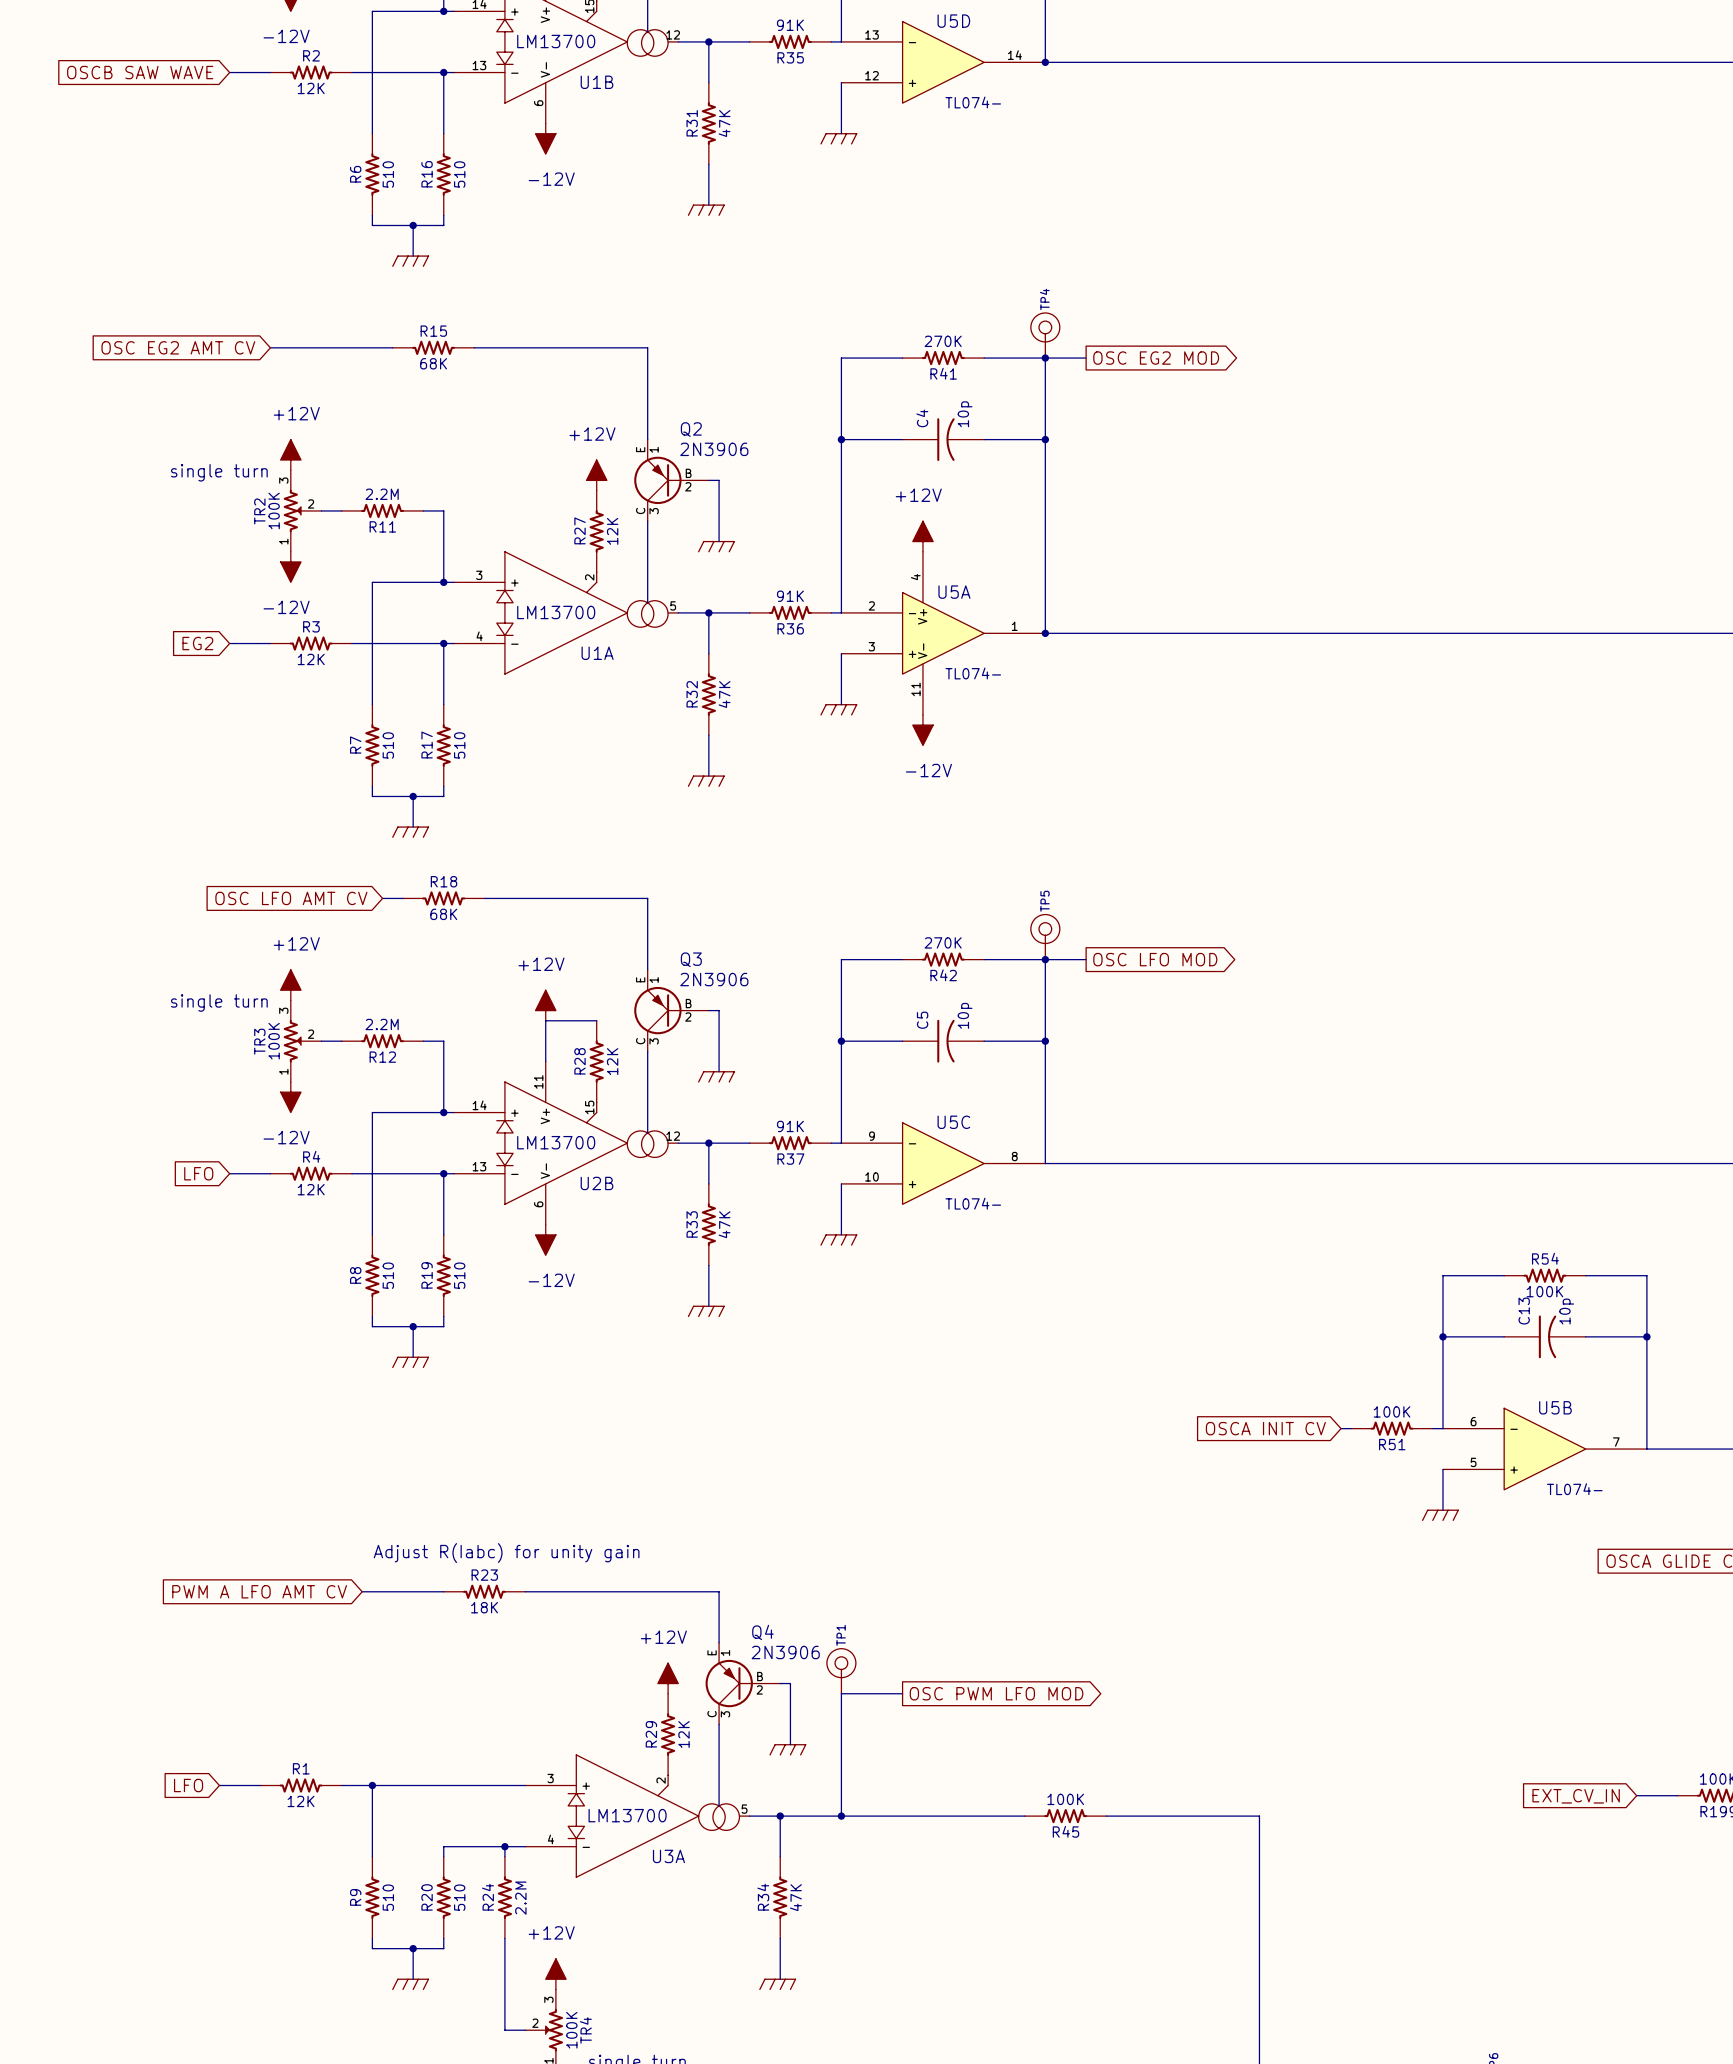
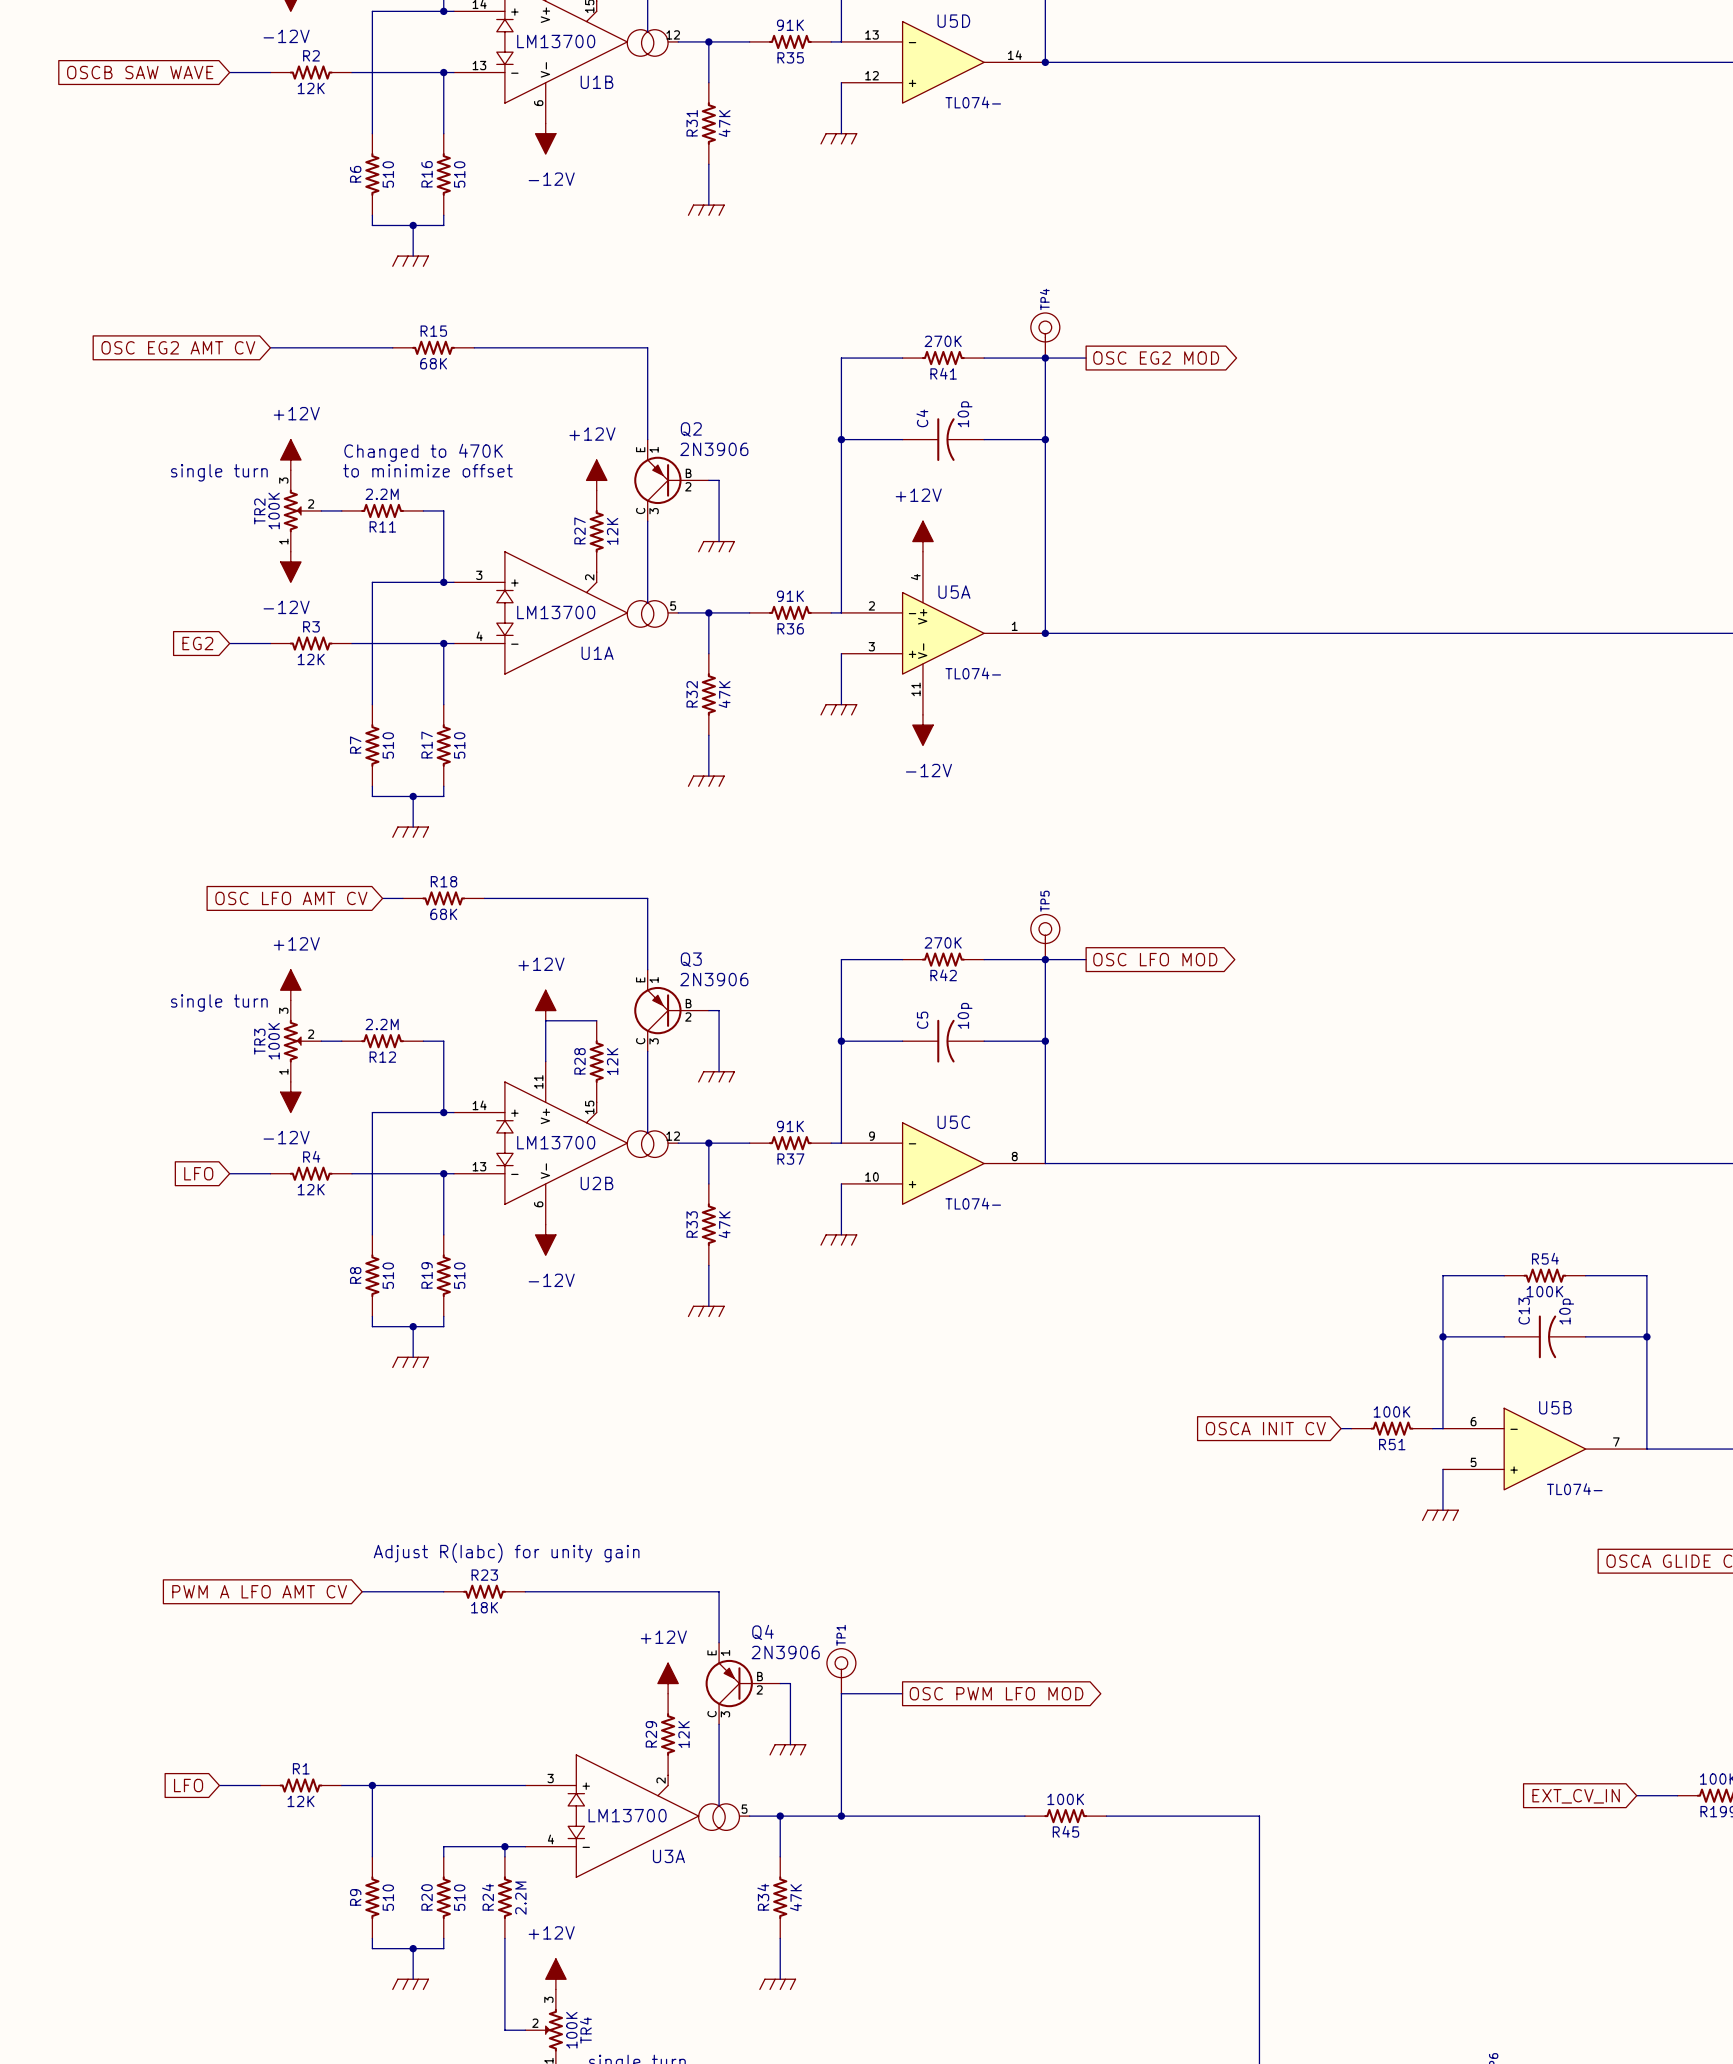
text: none -> Changed to 470K (423, 452)
text: none -> to minimize offset (427, 470)

